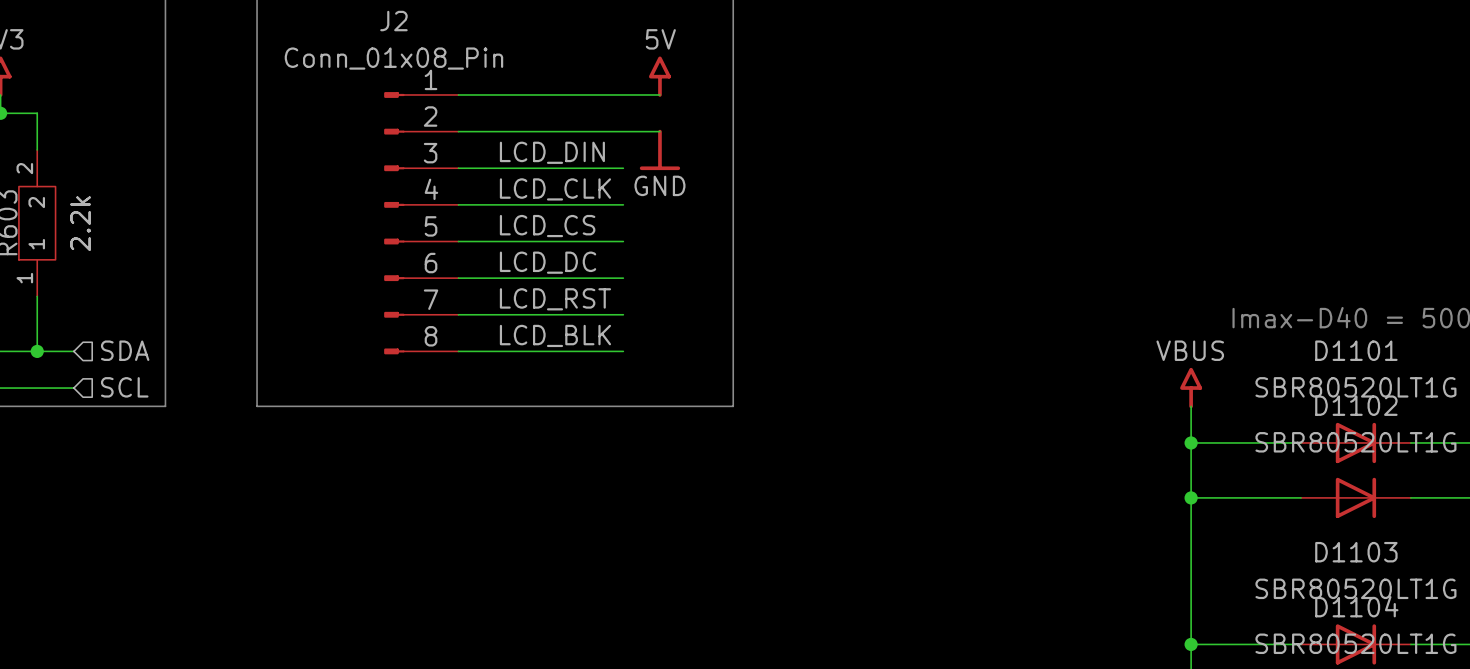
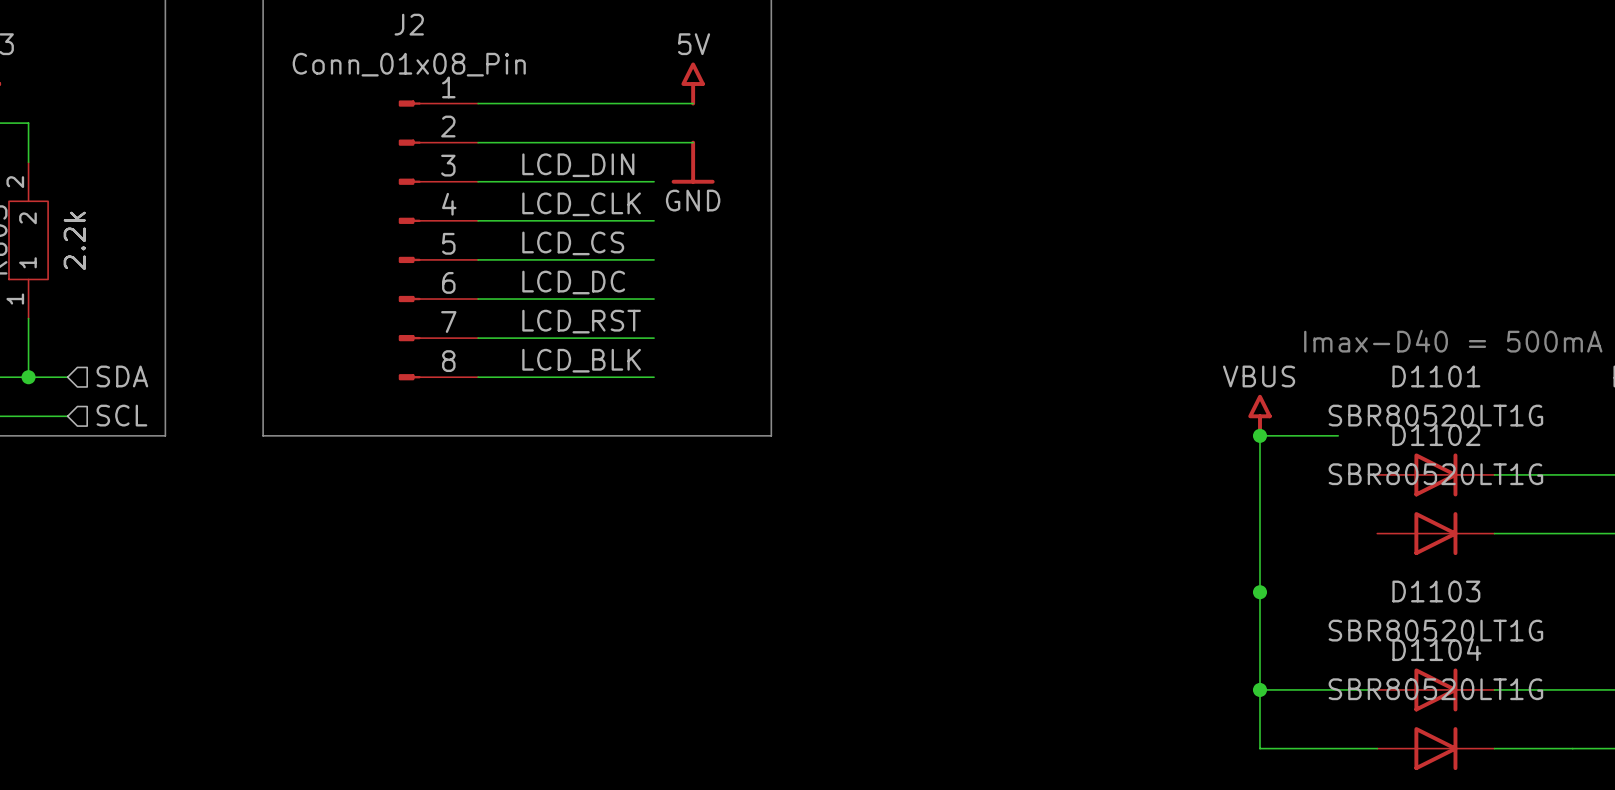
wire: none -> (1259, 435) (1338, 435)
wire: (1191, 442) (1301, 442) -> none
junction position: (1191, 442) -> (1259, 435)
wire: (1191, 497) (1301, 497) -> none
junction: (1191, 497) -> none
junction: none -> (1259, 592)

